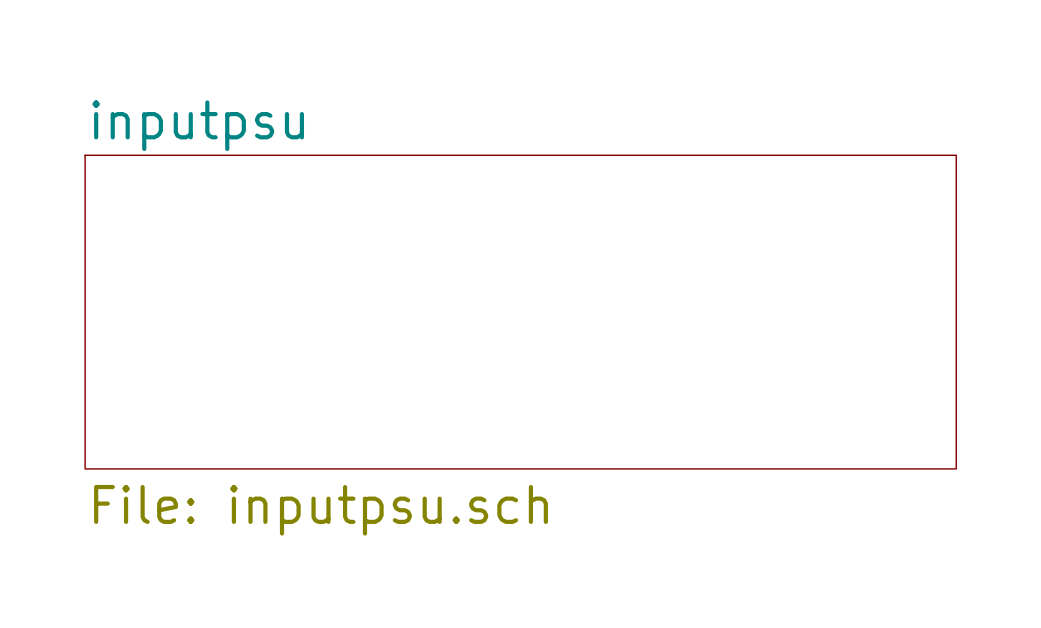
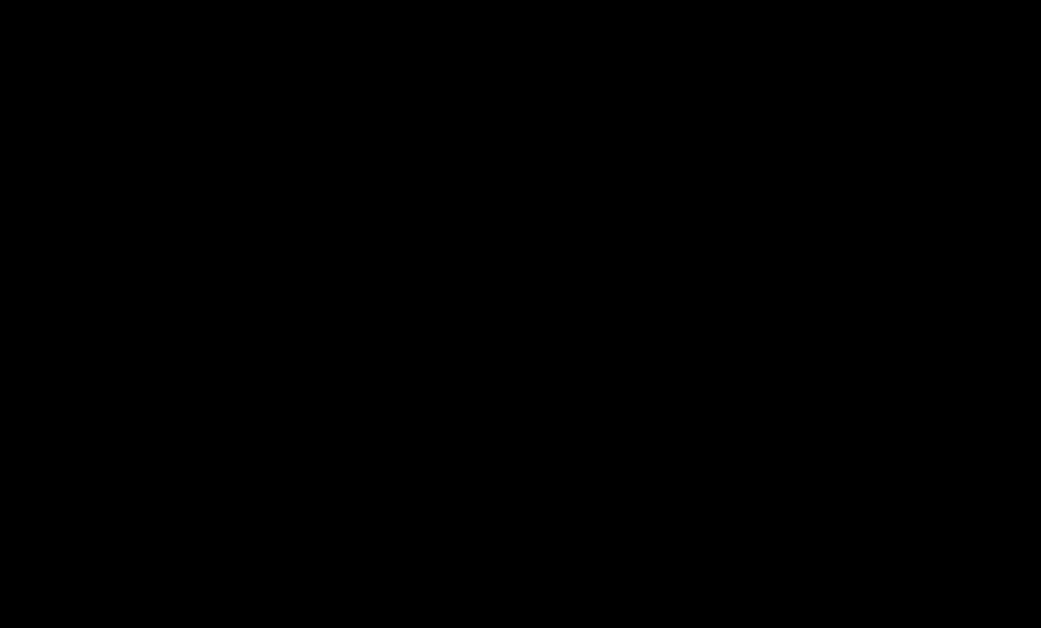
sheet inputpsu: File: inputpsu.sch (520, 312) -> none

